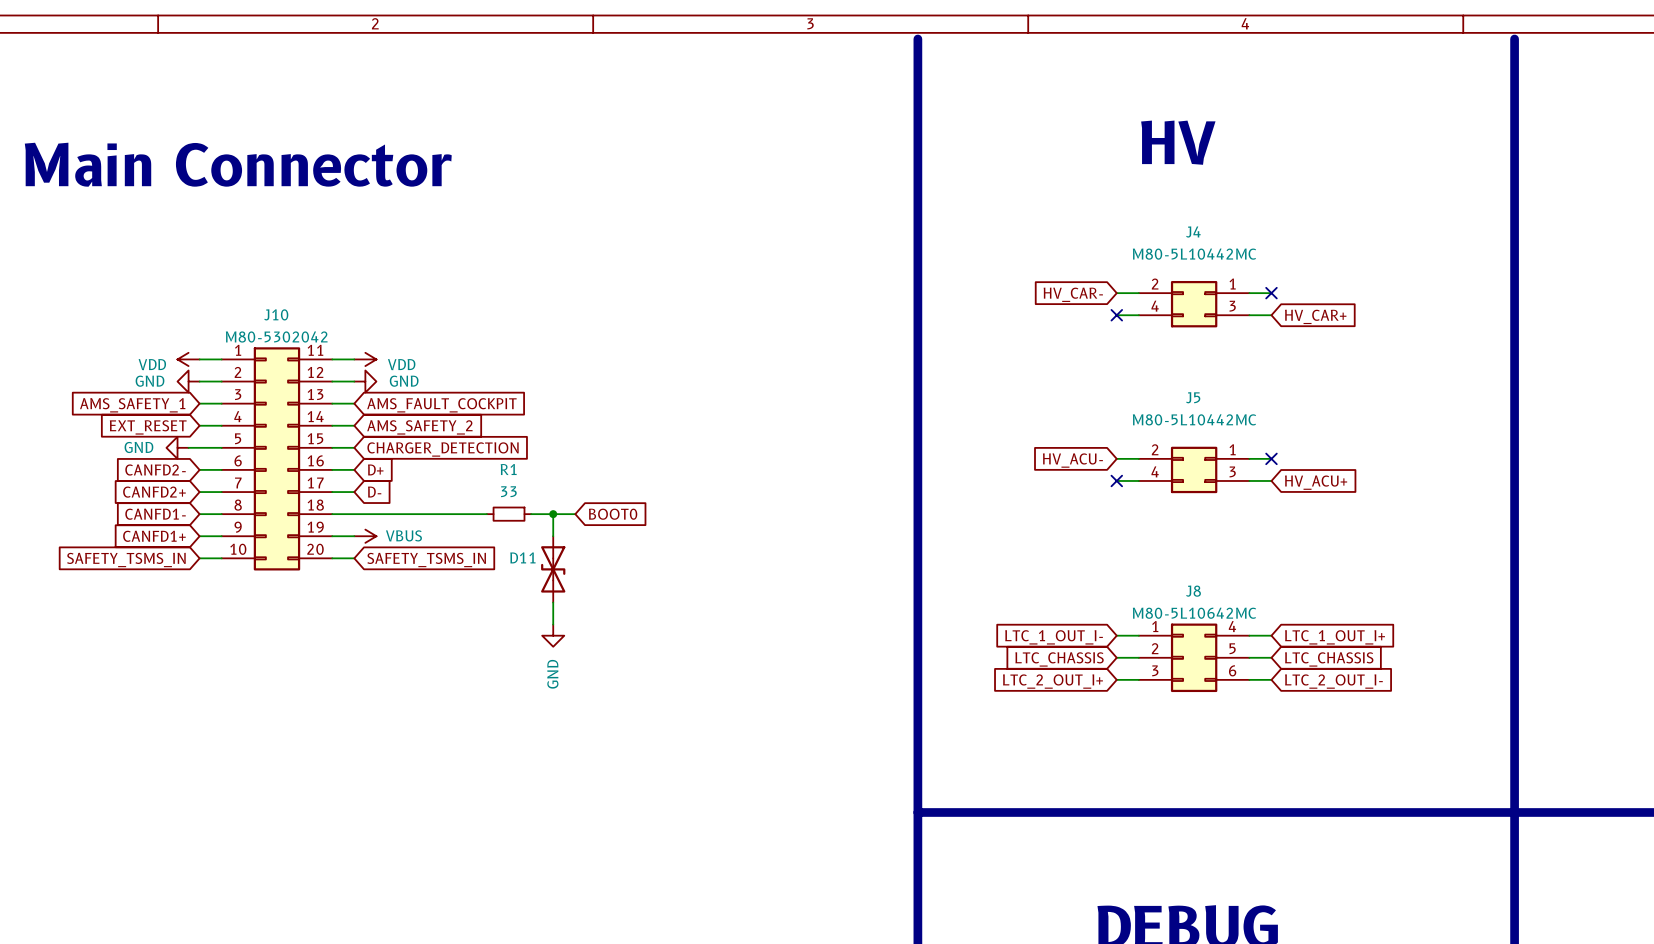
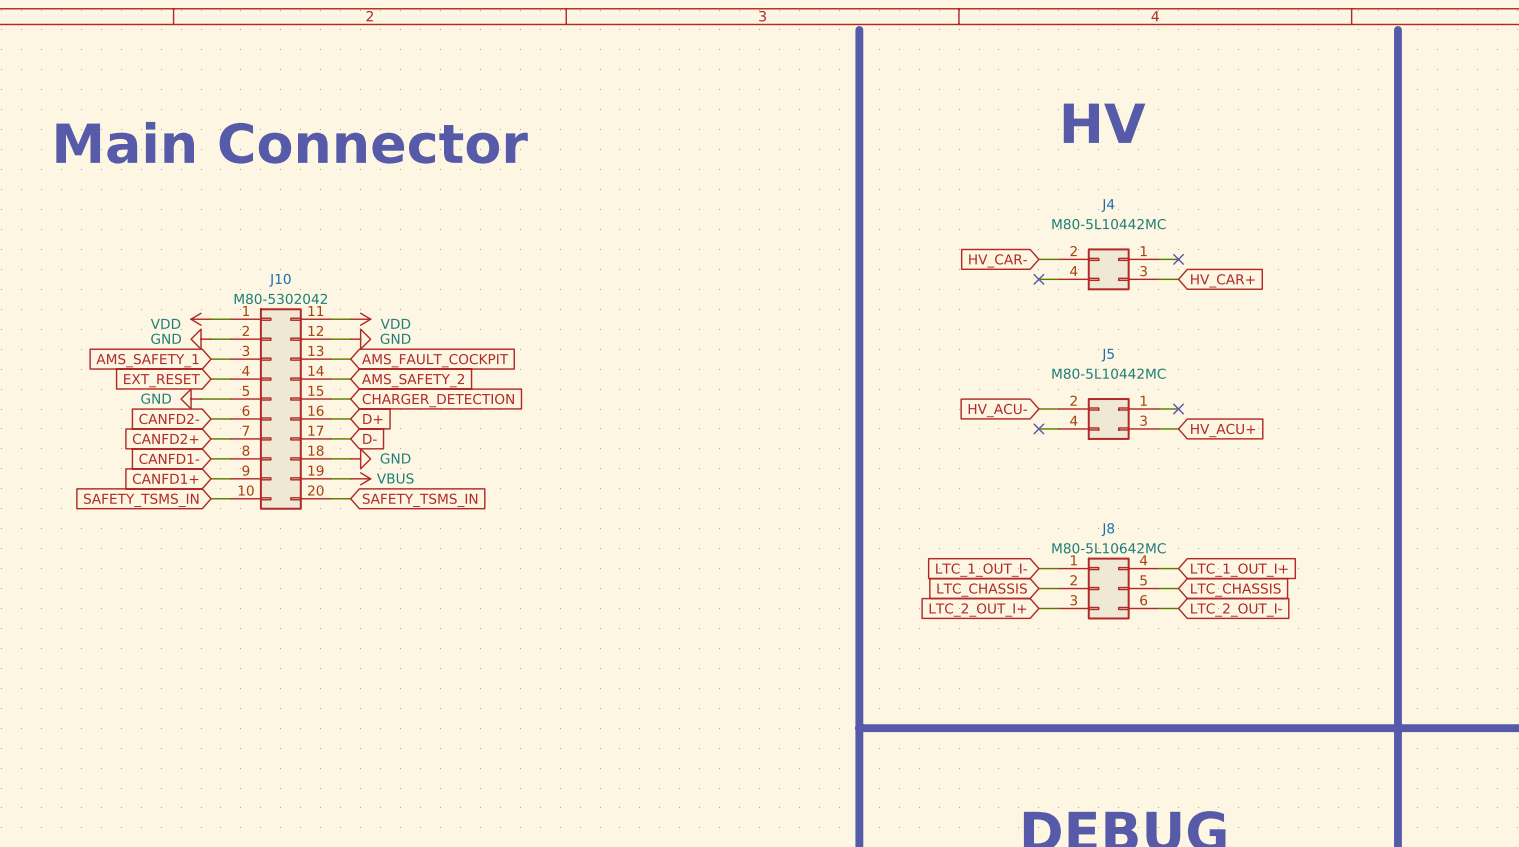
wire: (354, 514) (486, 514) -> none
power symbol: none -> GND (360, 458)
R1: 33 (509, 514) -> none
wire: (531, 514) (575, 514) -> none
wire: (553, 514) (553, 536) -> none
junction: (553, 514) -> none
global label: BOOT0 (613, 514) -> none
D11: (553, 569) -> none
wire: (553, 602) (553, 624) -> none
power symbol: GND (553, 635) -> none

